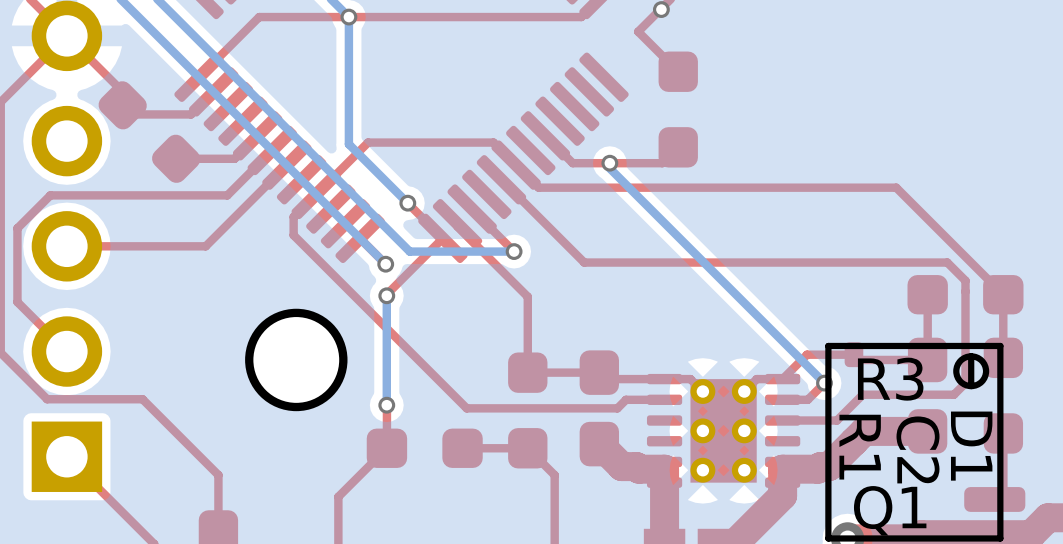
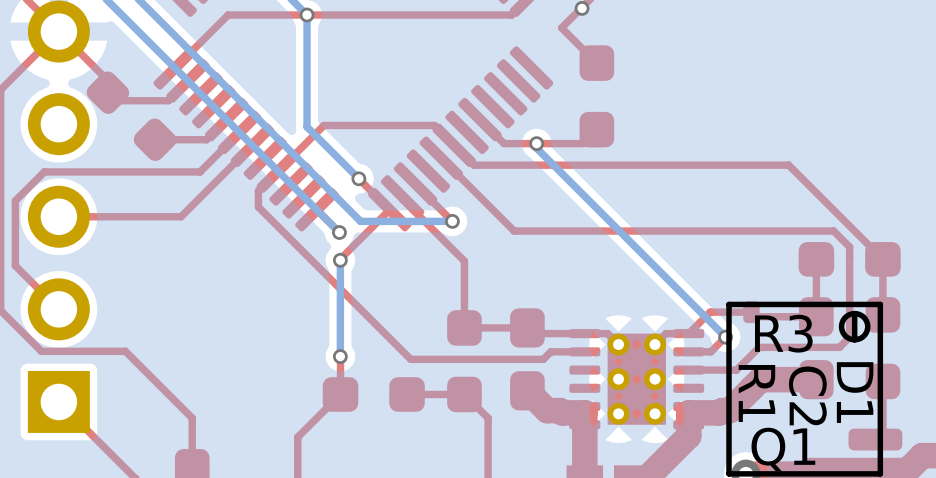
round board edge: [245, 308, 348, 412] -> none

